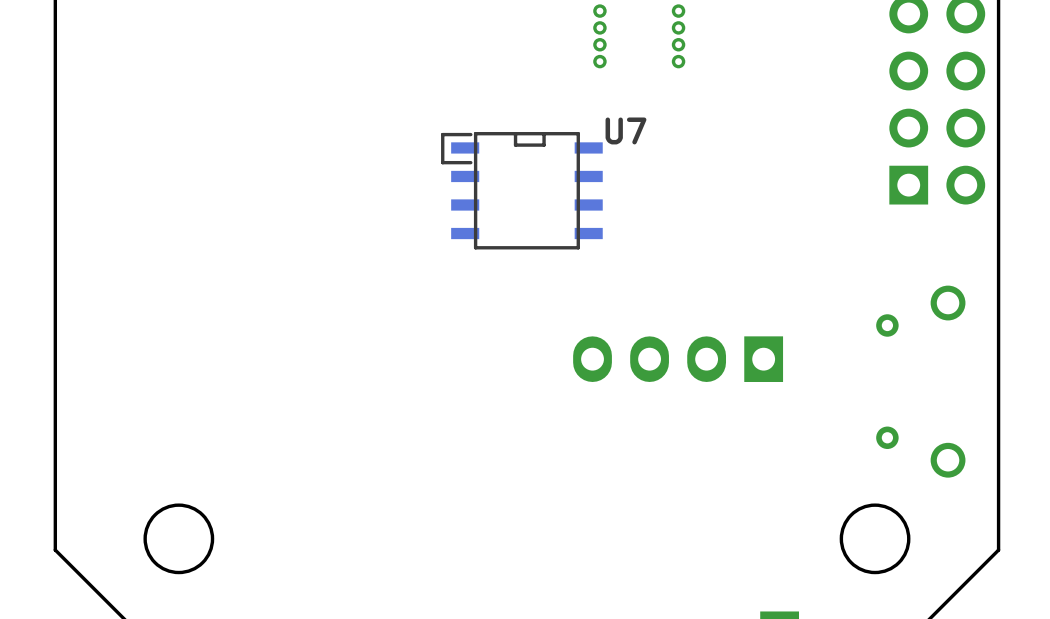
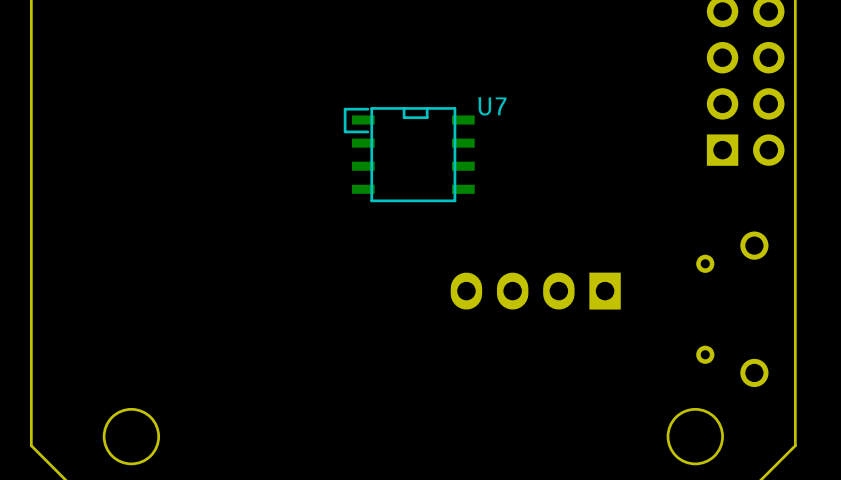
via: (599, 11) -> none
via: (678, 11) -> none
via: (599, 27) -> none
via: (678, 27) -> none
via: (599, 44) -> none
via: (678, 44) -> none
via: (599, 61) -> none
via: (678, 61) -> none

